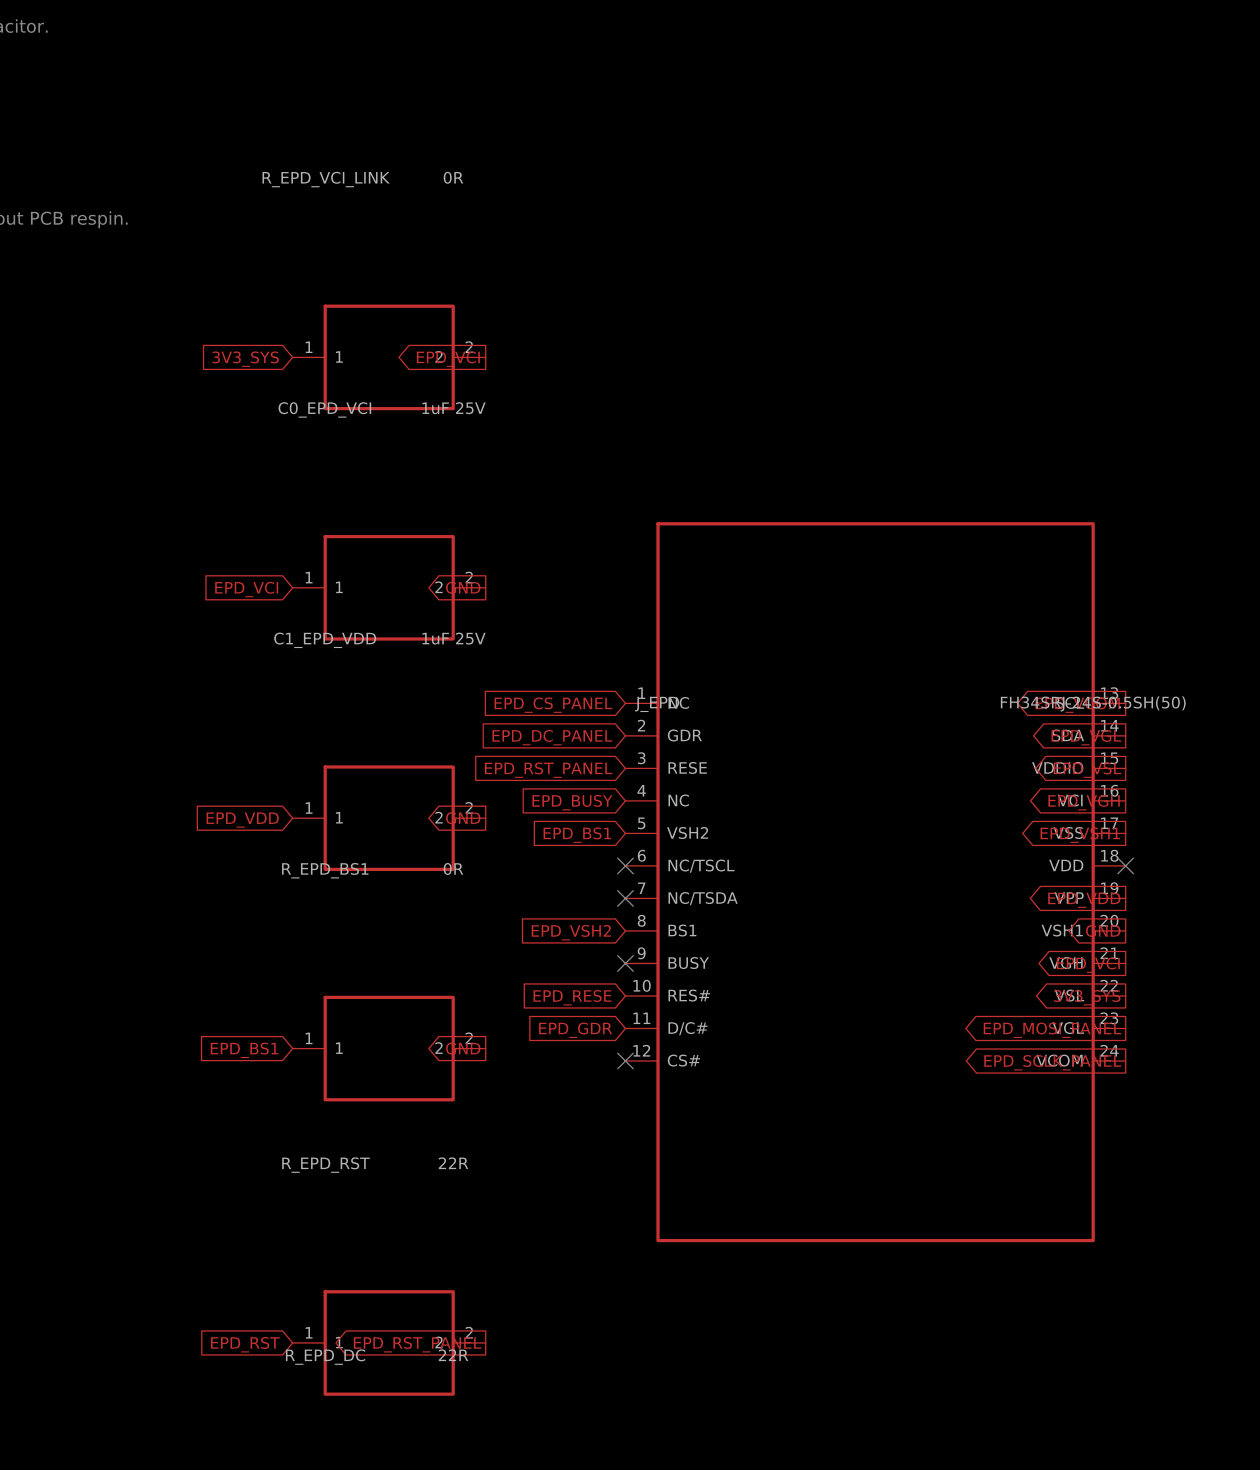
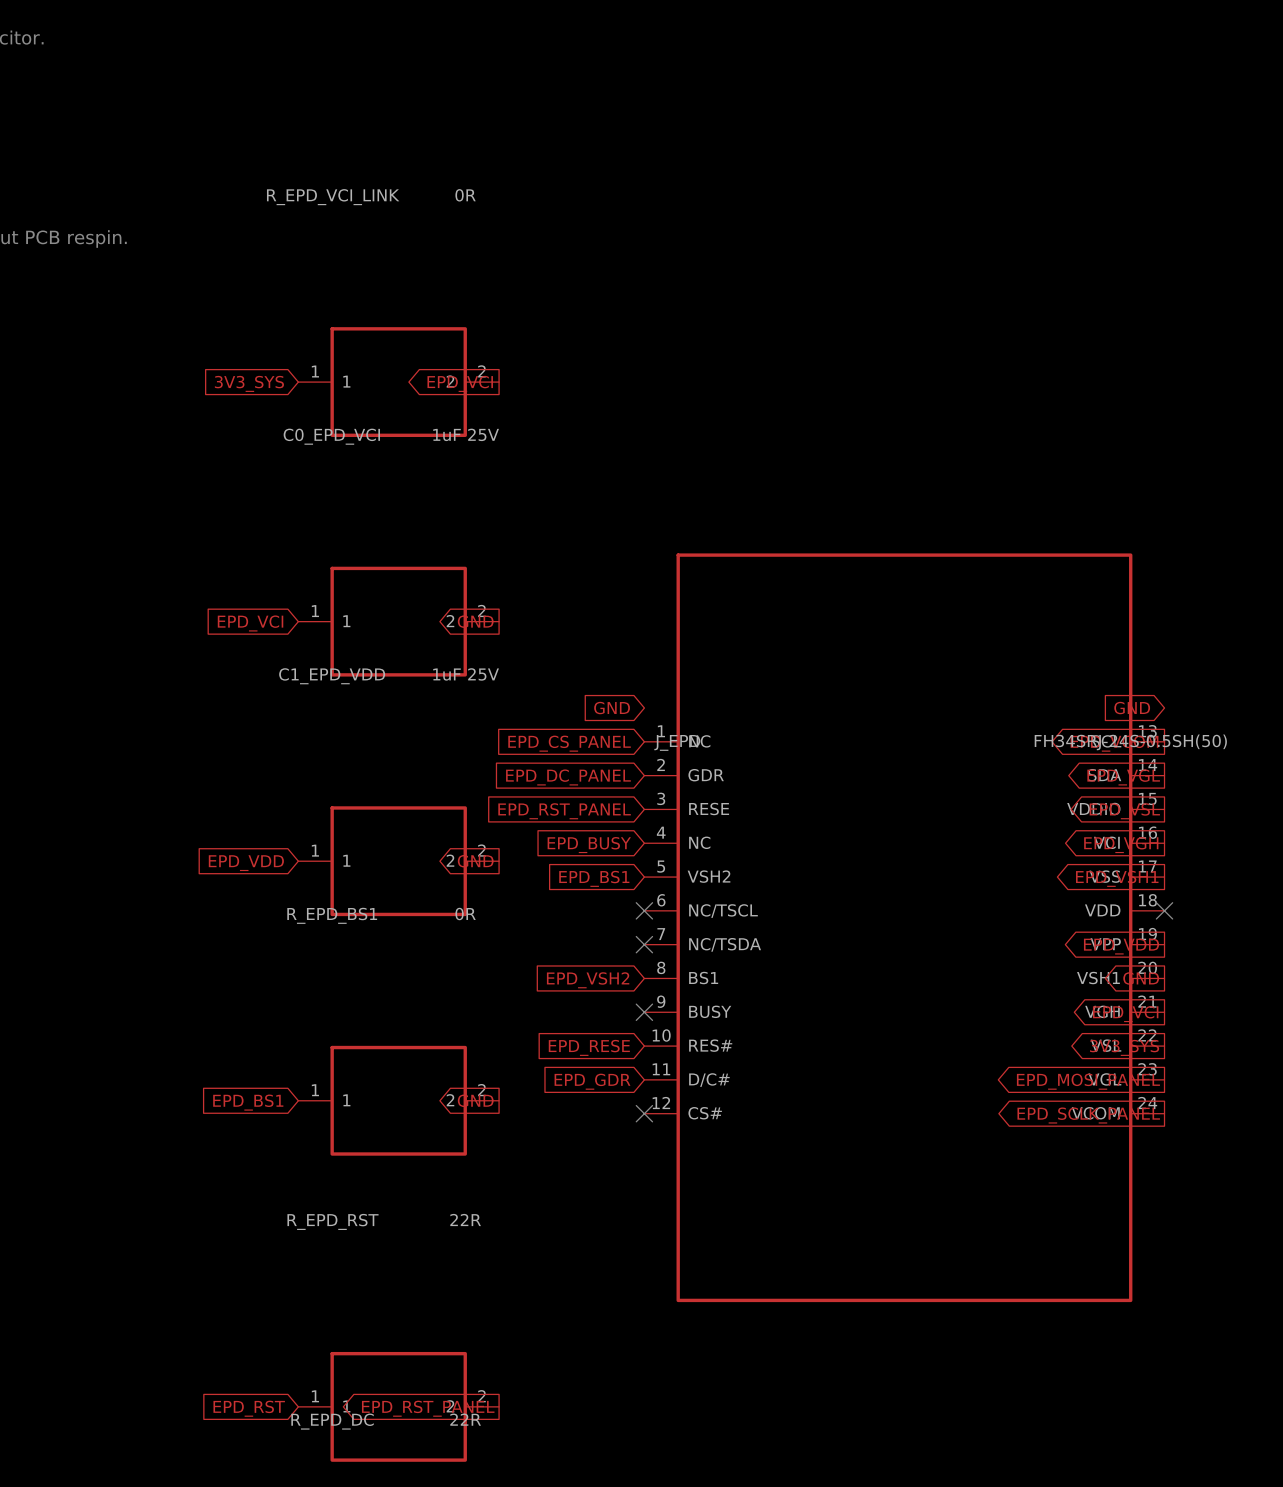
global label: none -> GND (612, 708)
global label: none -> GND (1132, 708)

